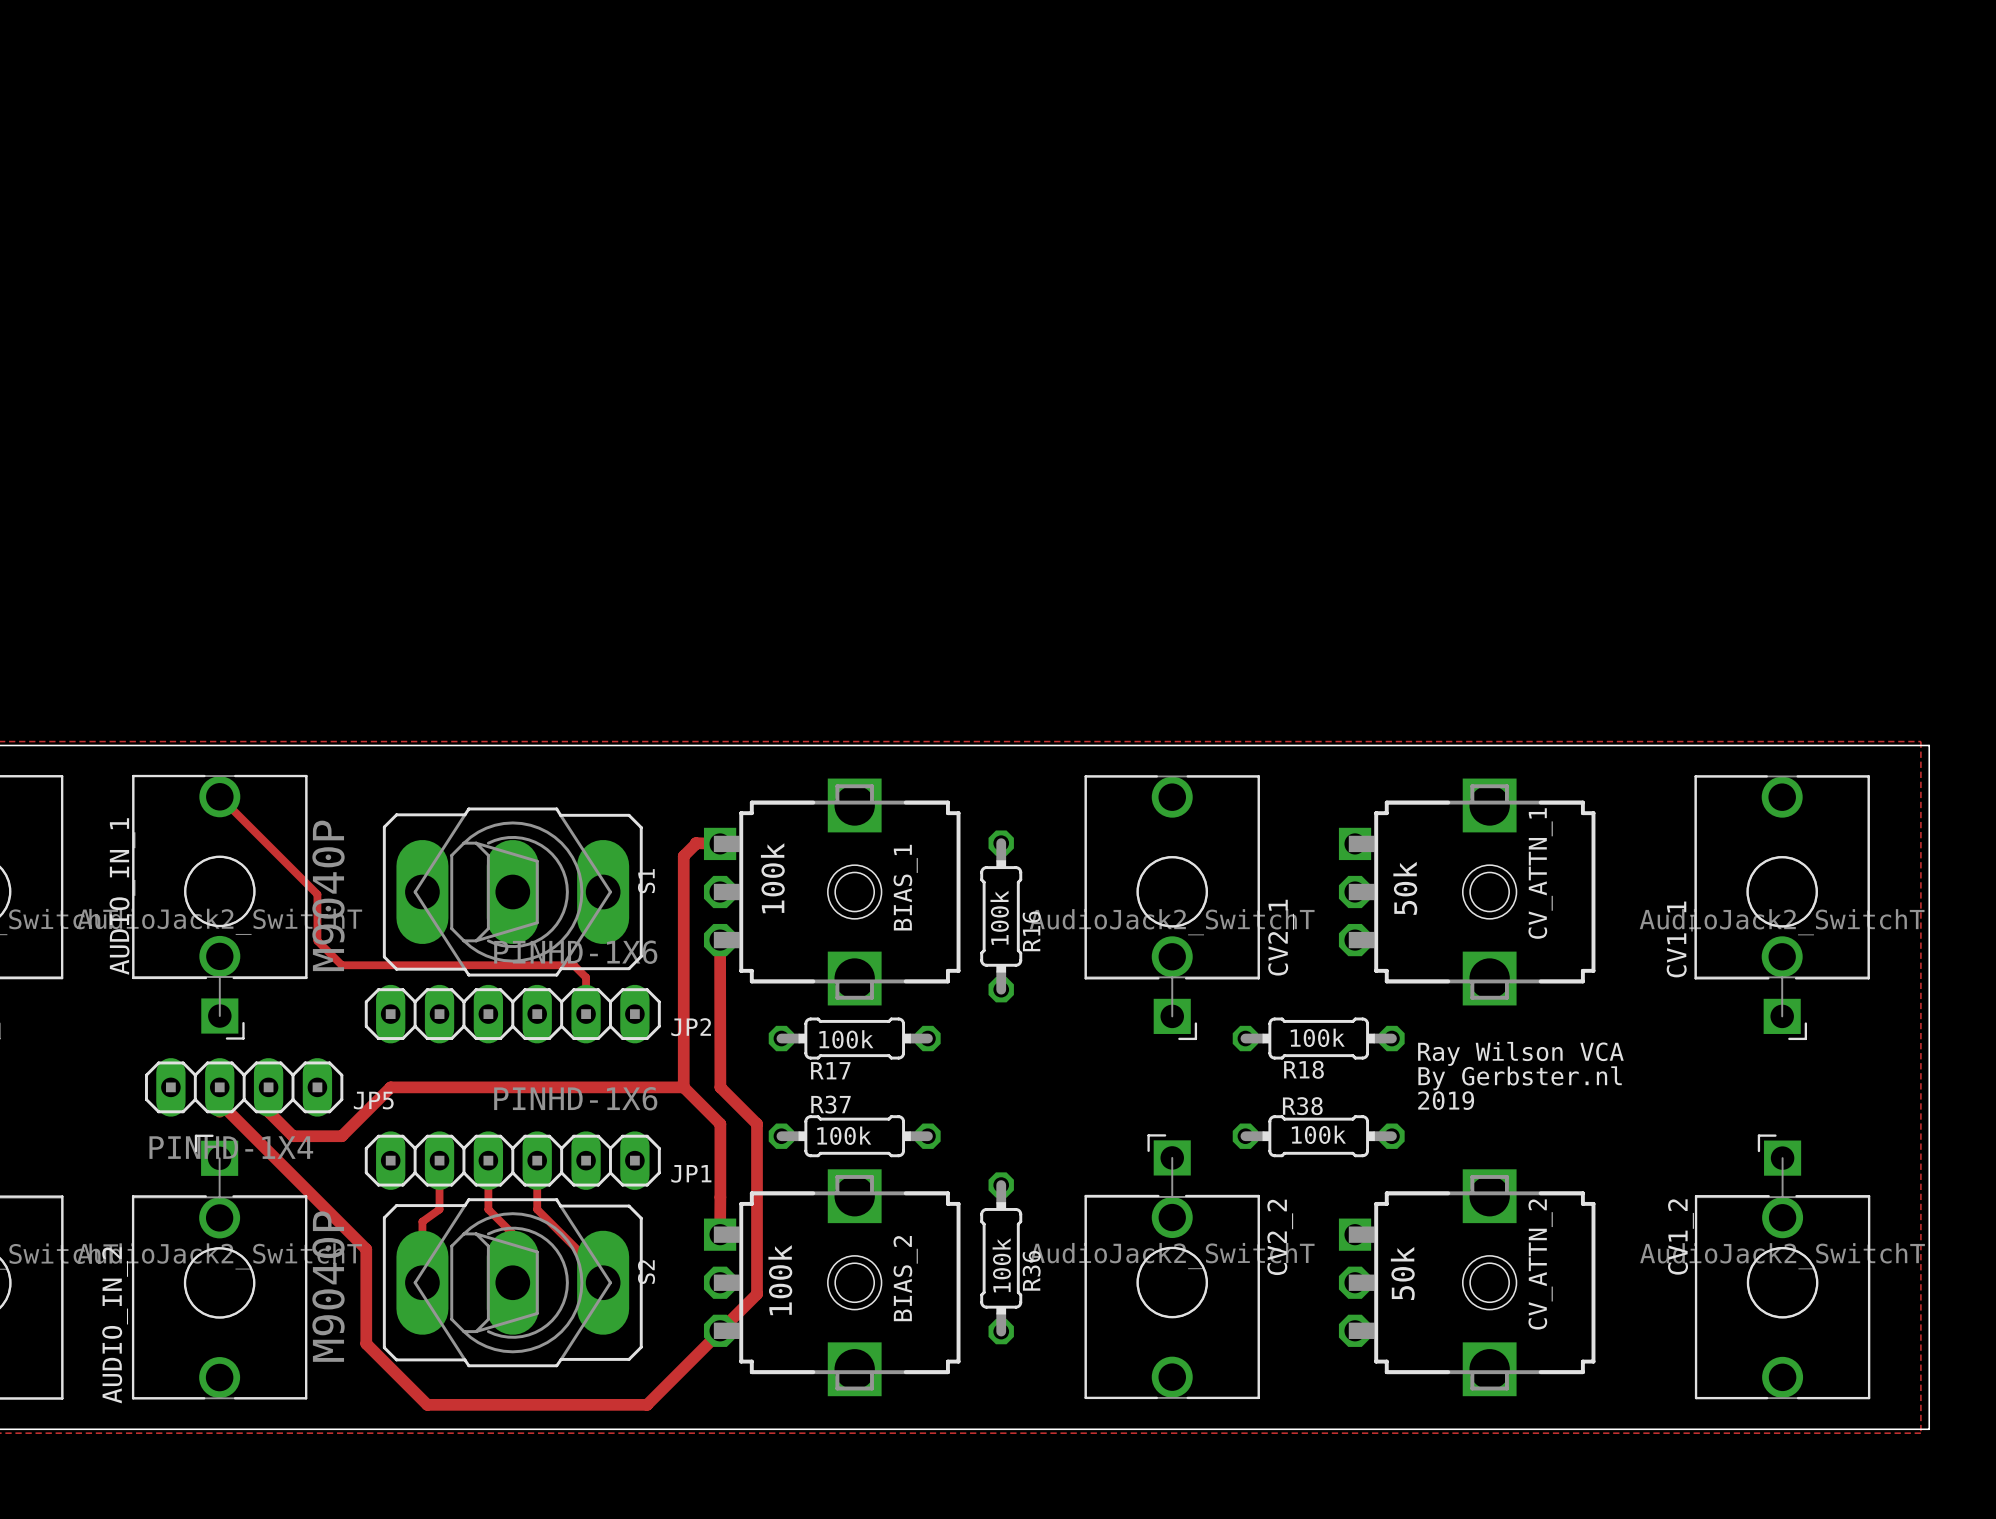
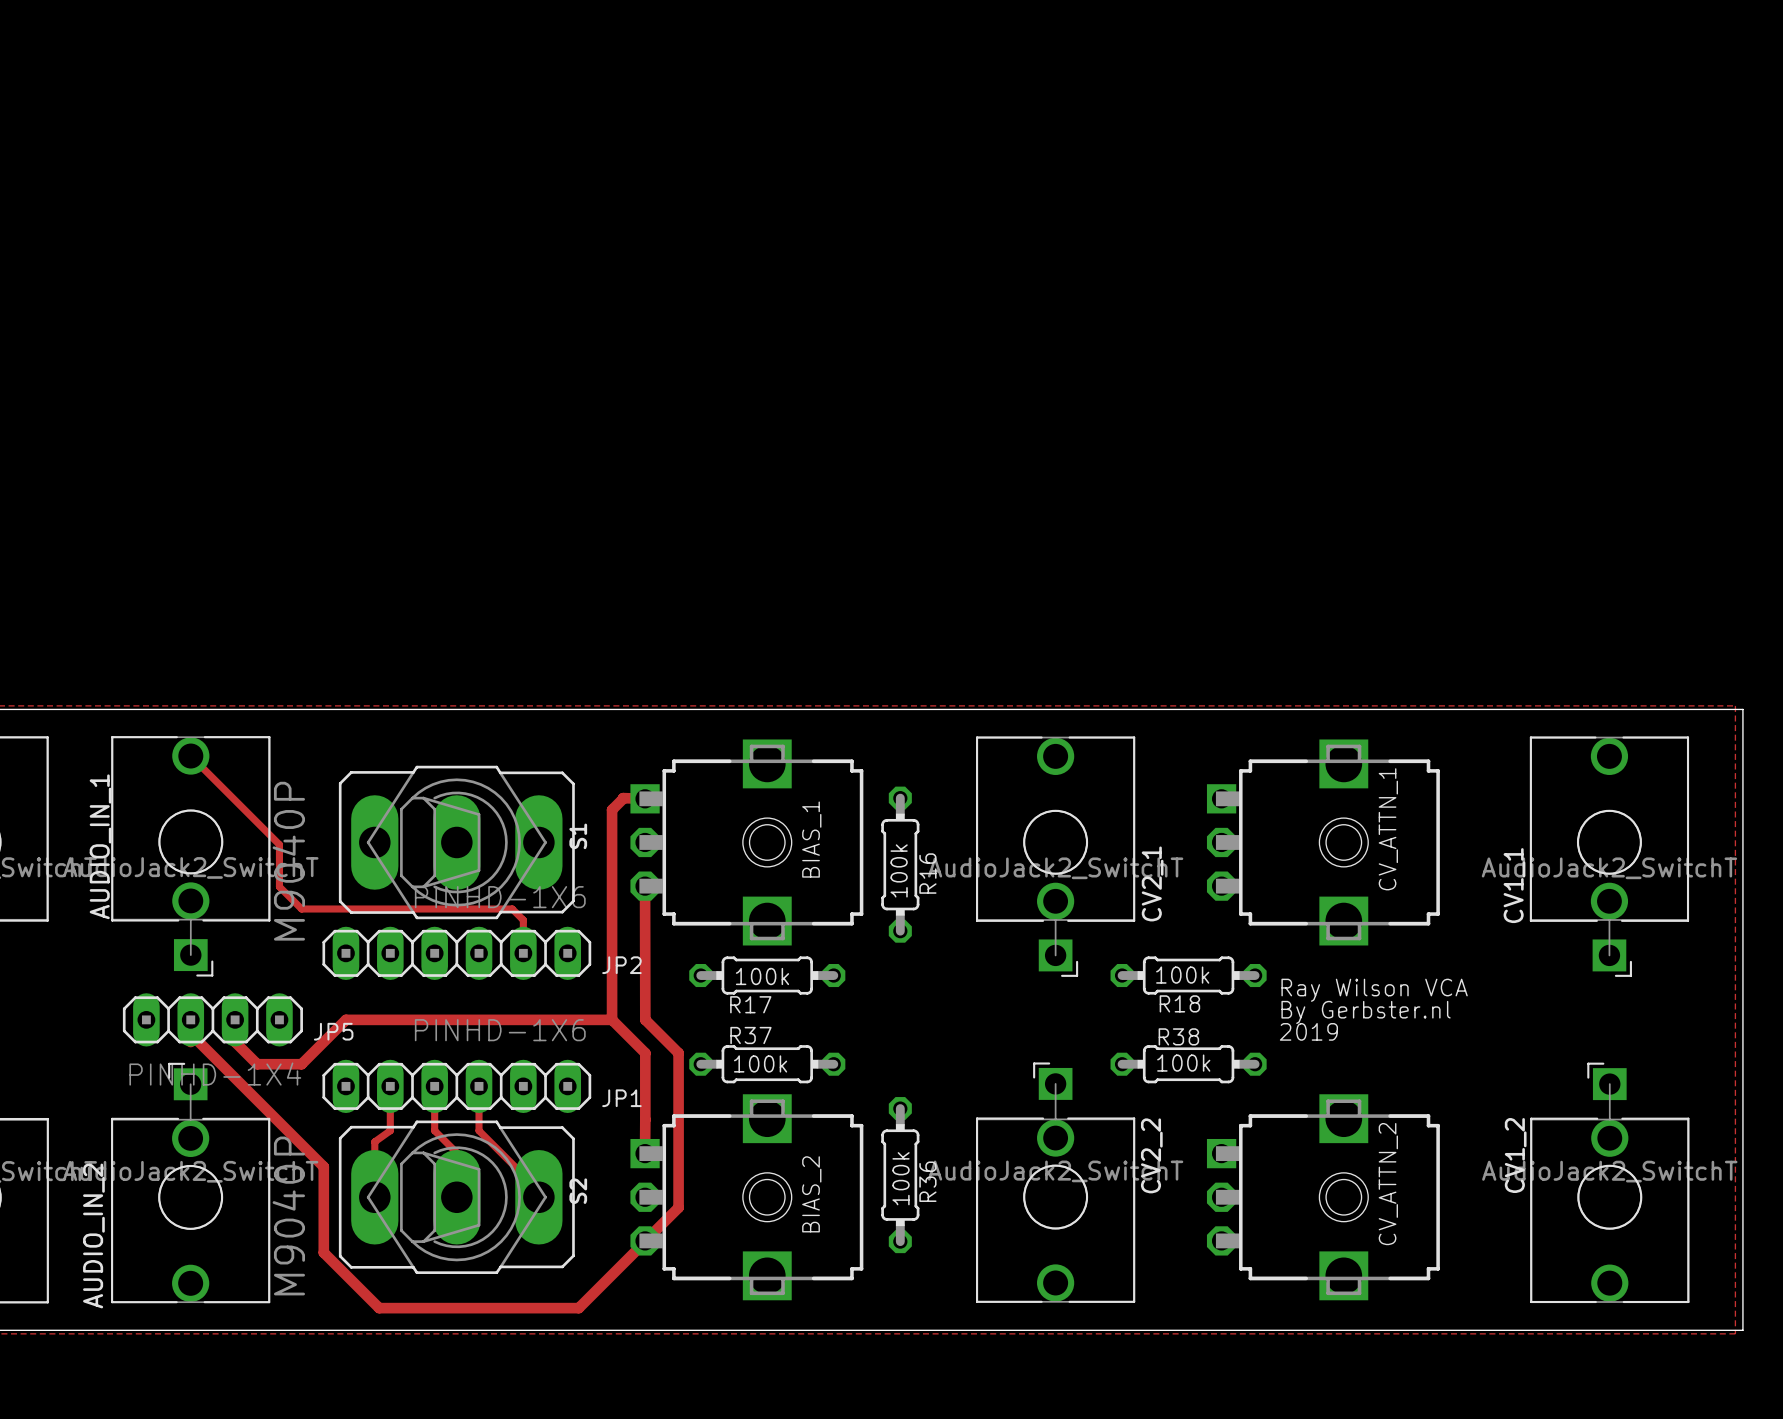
BIAS_1 value: 100k (772, 878) -> none
CV_ATTN_1 value: 50k (1405, 888) -> none
CV_ATTN_2 value: 50k (1402, 1273) -> none
BIAS_2 value: 100k (780, 1280) -> none

